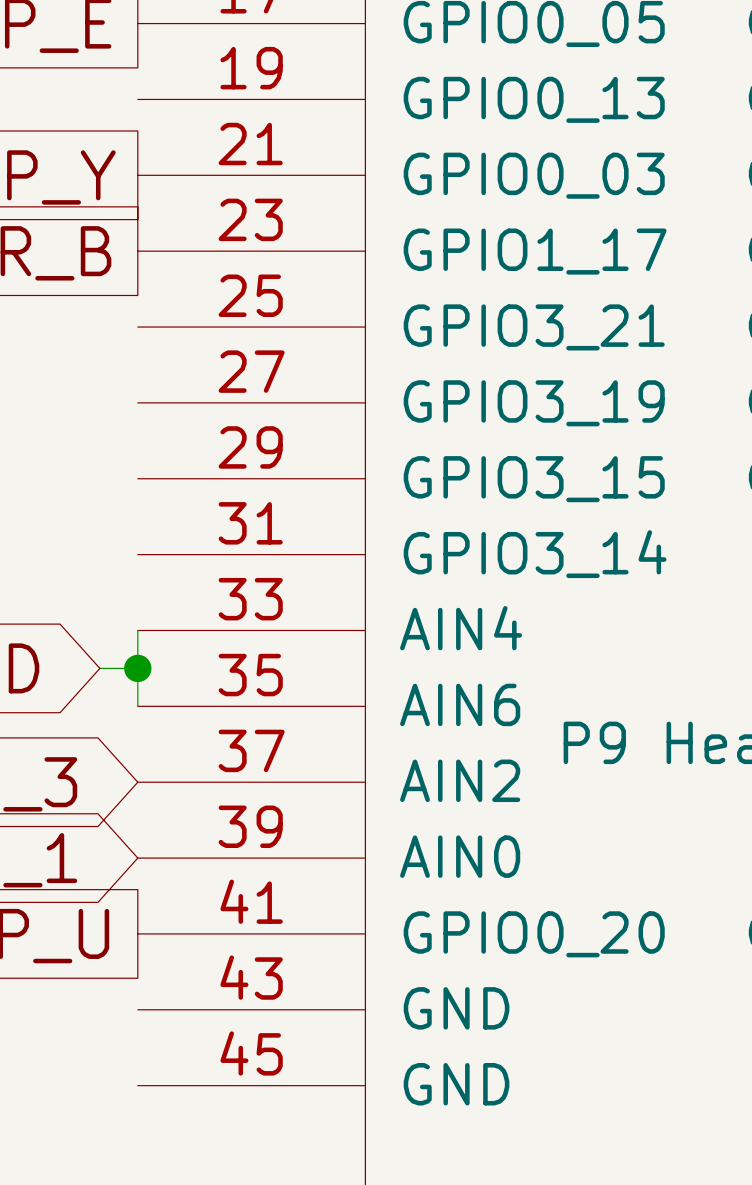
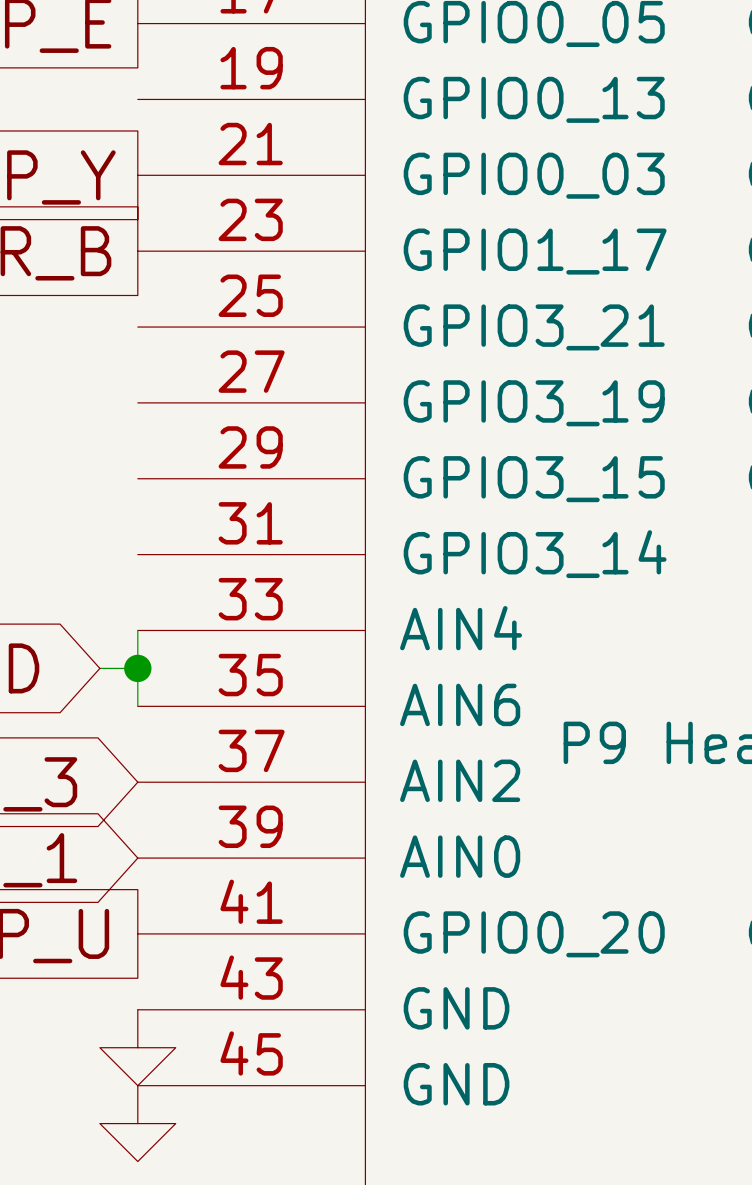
power symbol: none -> (137, 1047)
power symbol: none -> (137, 1123)

